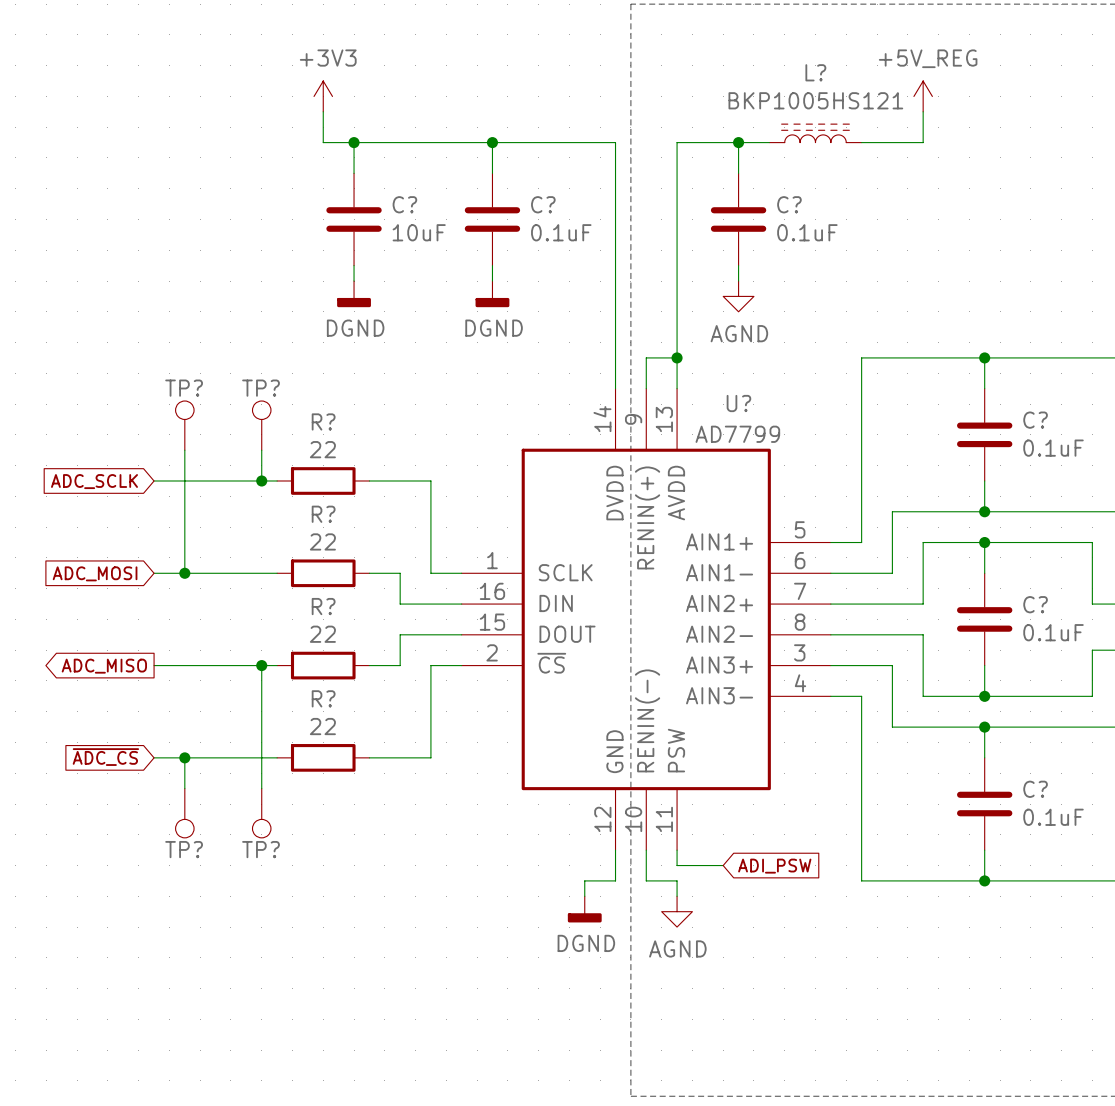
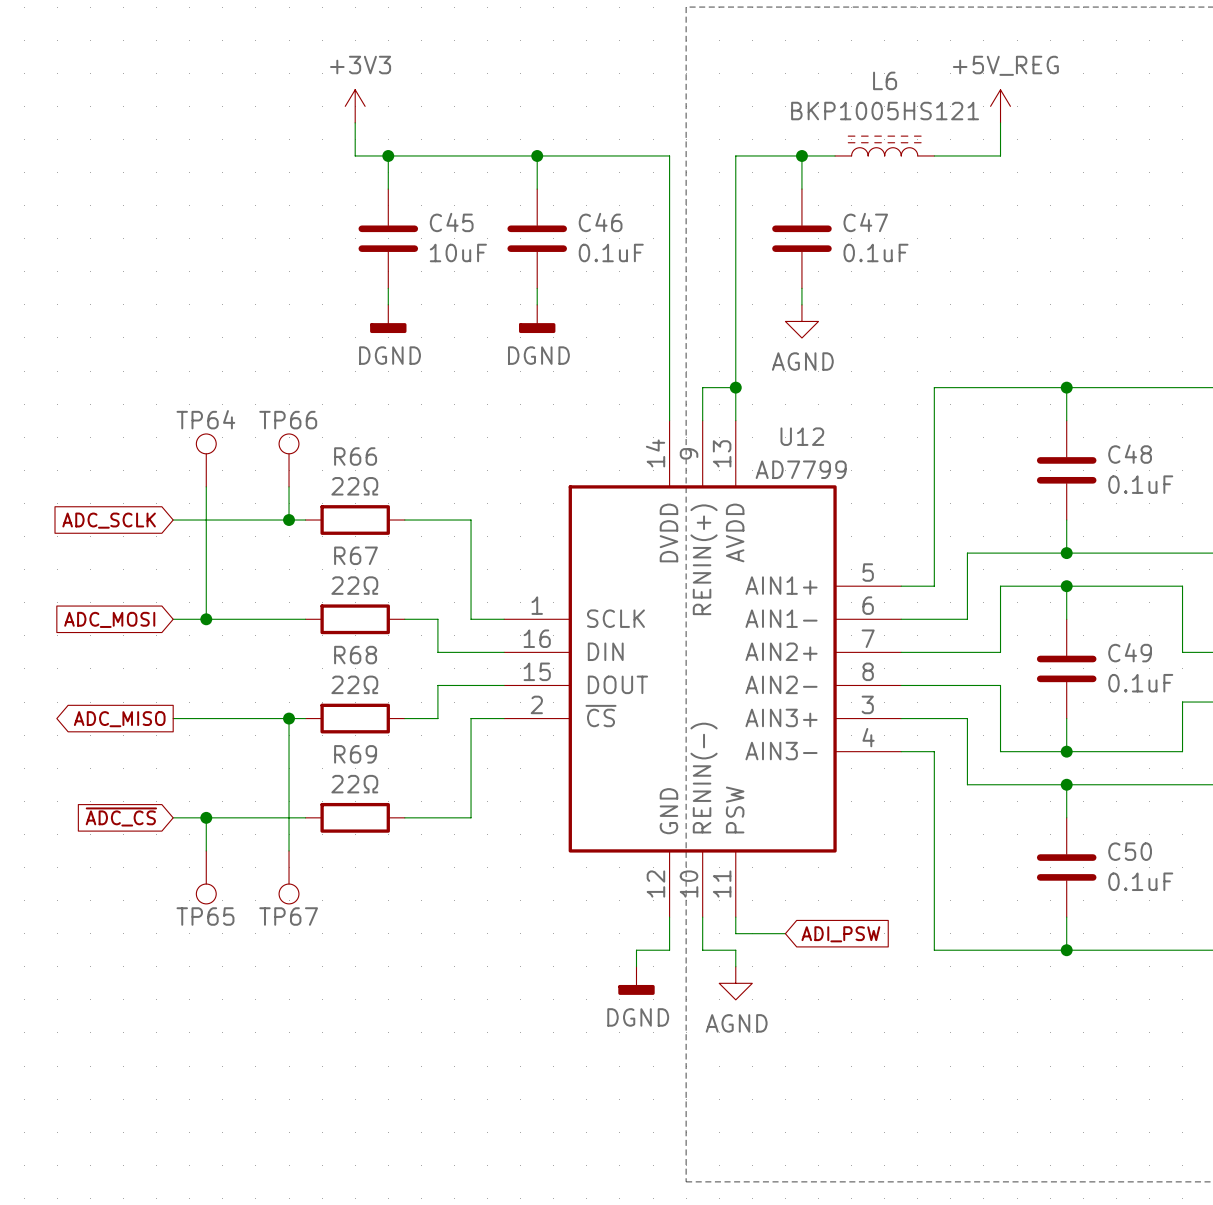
L? name: L? (815, 72) -> L6 (885, 80)
C? name: C? (404, 204) -> C45 (451, 222)
C? name: C? (543, 204) -> C46 (600, 222)
C? name: C? (789, 204) -> C47 (865, 222)
TP? name: TP? (184, 388) -> TP64 (205, 419)
TP? name: TP? (261, 388) -> TP66 (288, 420)
U? name: U? (738, 403) -> U12 (802, 436)
C? name: C? (1035, 420) -> C48 (1130, 454)
R? name: R? (323, 421) -> R66 (355, 456)
R? value: 22 (322, 449) -> 22Ω (354, 486)
R? name: R? (323, 514) -> R67 (355, 555)
R? value: 22 (322, 541) -> 22Ω (354, 585)
C? name: C? (1035, 604) -> C49 (1130, 652)
R? name: R? (323, 606) -> R68 (355, 655)
R? value: 22 (322, 634) -> 22Ω (354, 684)
R? name: R? (323, 698) -> R69 (355, 754)
R? value: 22 (322, 726) -> 22Ω (354, 784)
C? name: C? (1035, 789) -> C50 (1130, 851)
TP? name: TP? (184, 849) -> TP65 (205, 916)
TP? name: TP? (261, 849) -> TP67 (288, 916)

